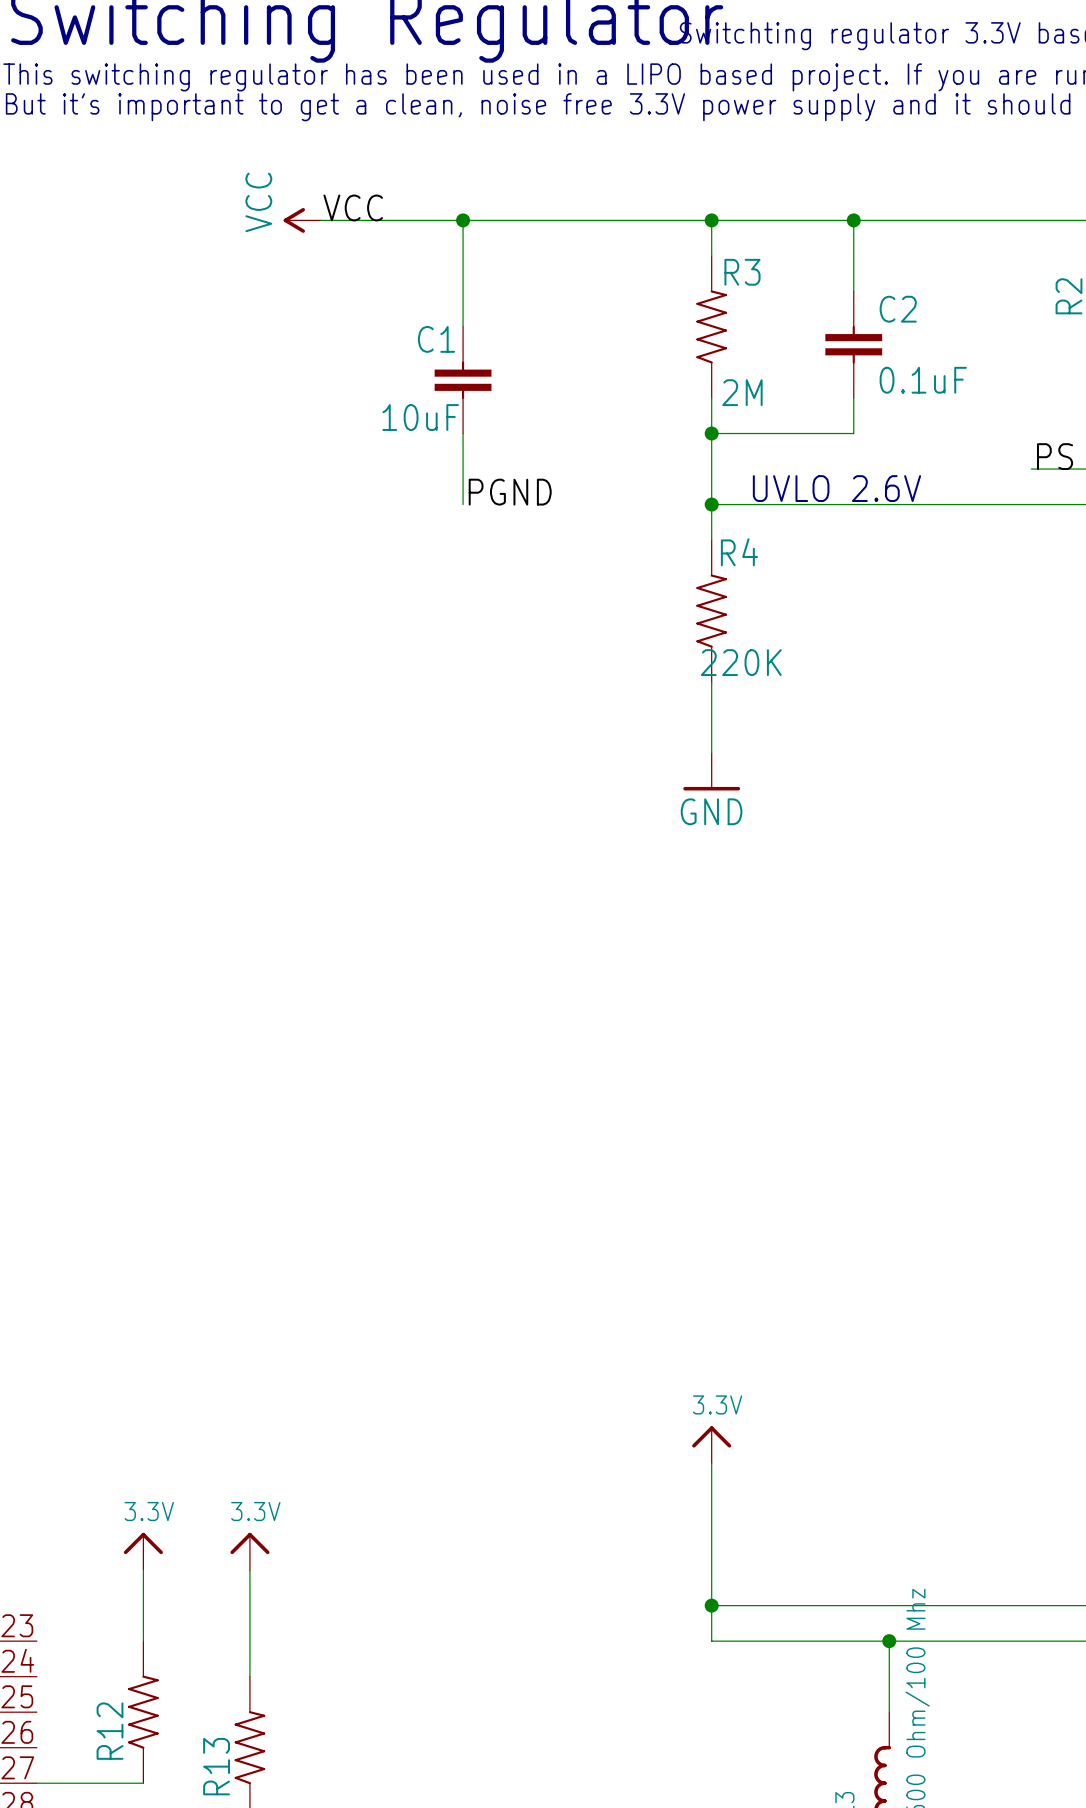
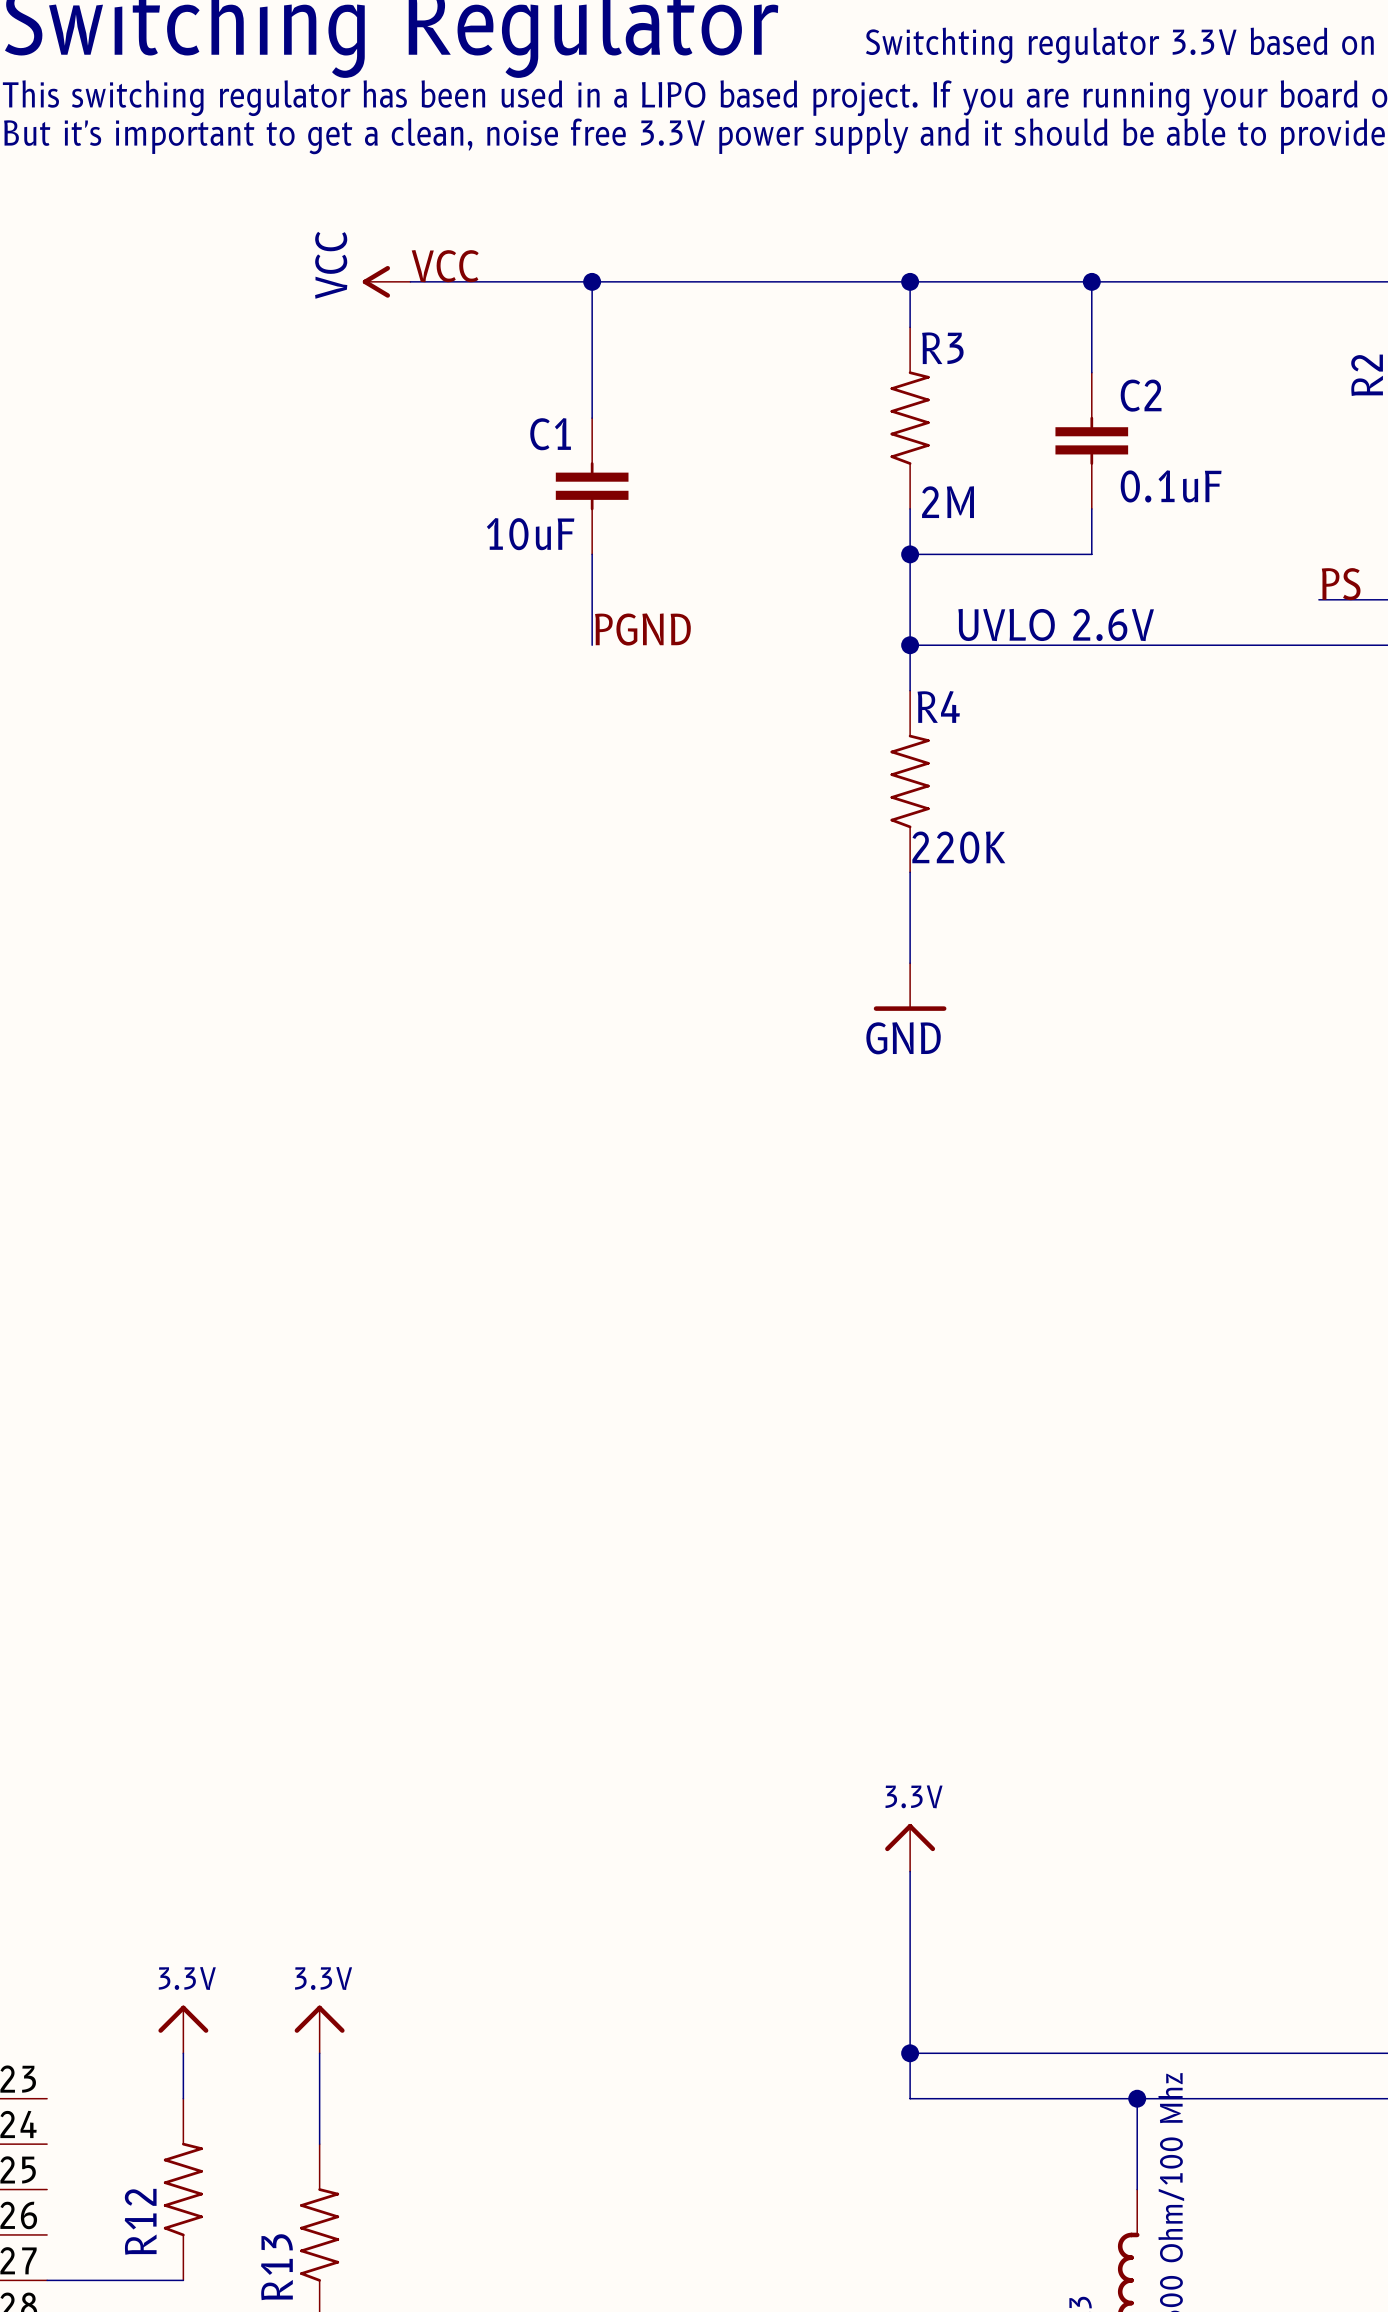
power symbol position: 3.3V (143, 1551) -> 3.3V (183, 2029)
power symbol position: 3.3V (249, 1551) -> 3.3V (319, 2029)

